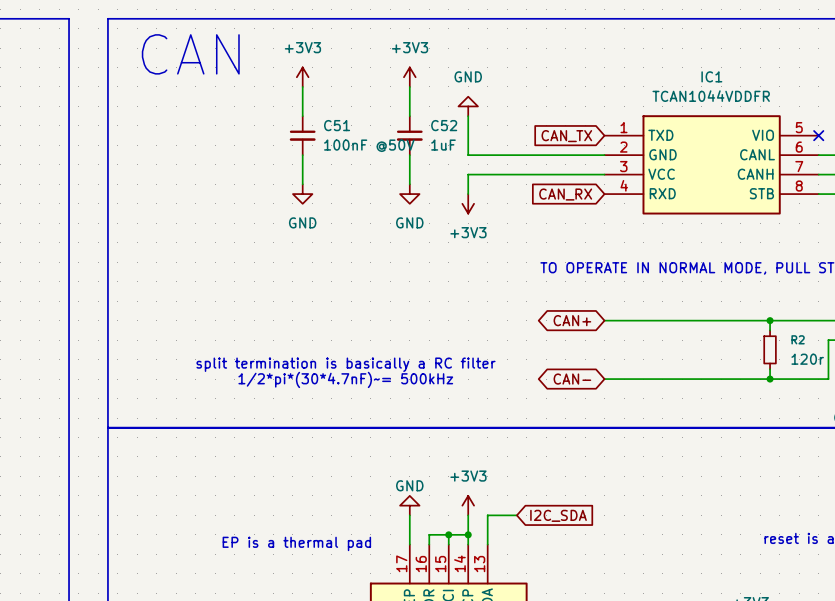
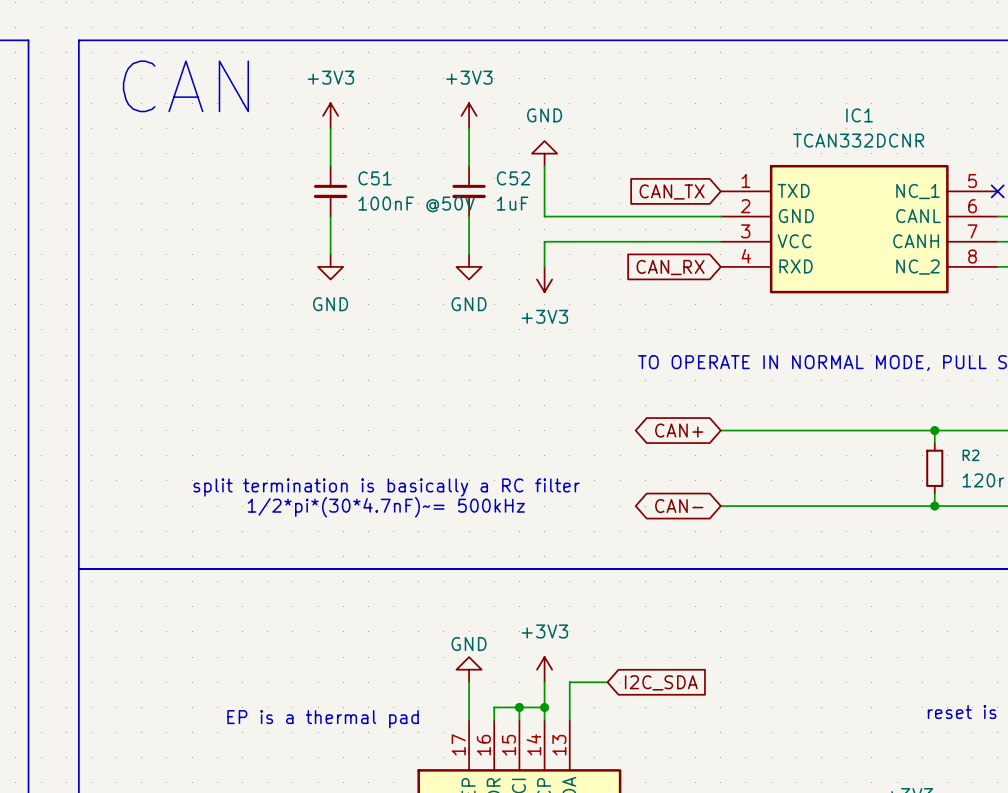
IC1 value: TCAN1044VDDFR (711, 96) -> TCAN332DCNR (858, 140)
IC1 pin name: VIO (763, 135) -> NC_1 (917, 191)
IC1 pin name: STB (761, 193) -> NC_2 (917, 267)

